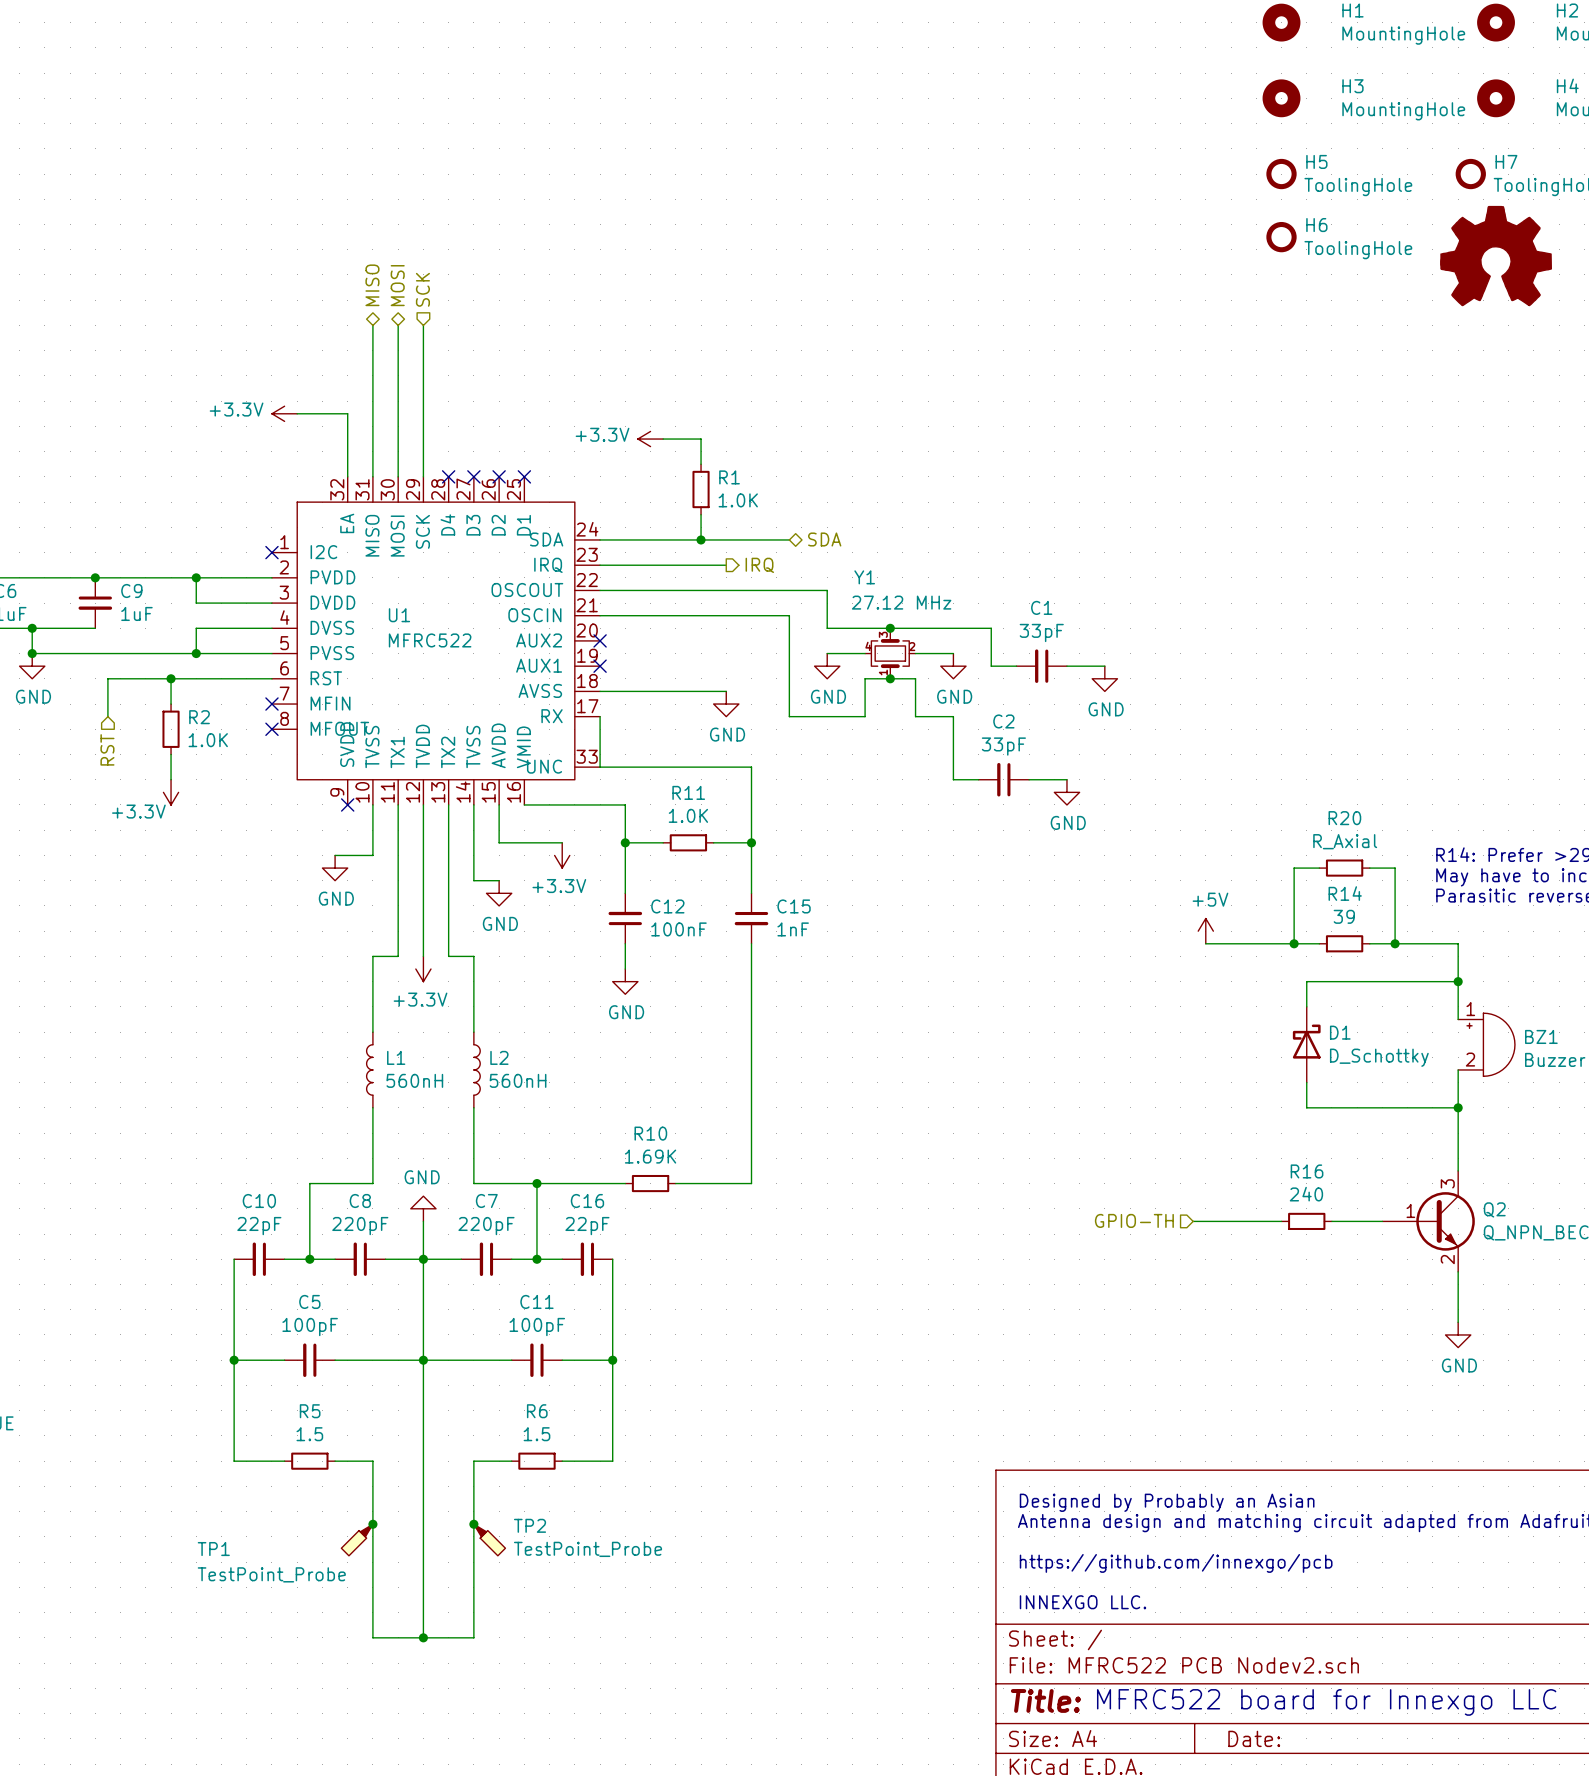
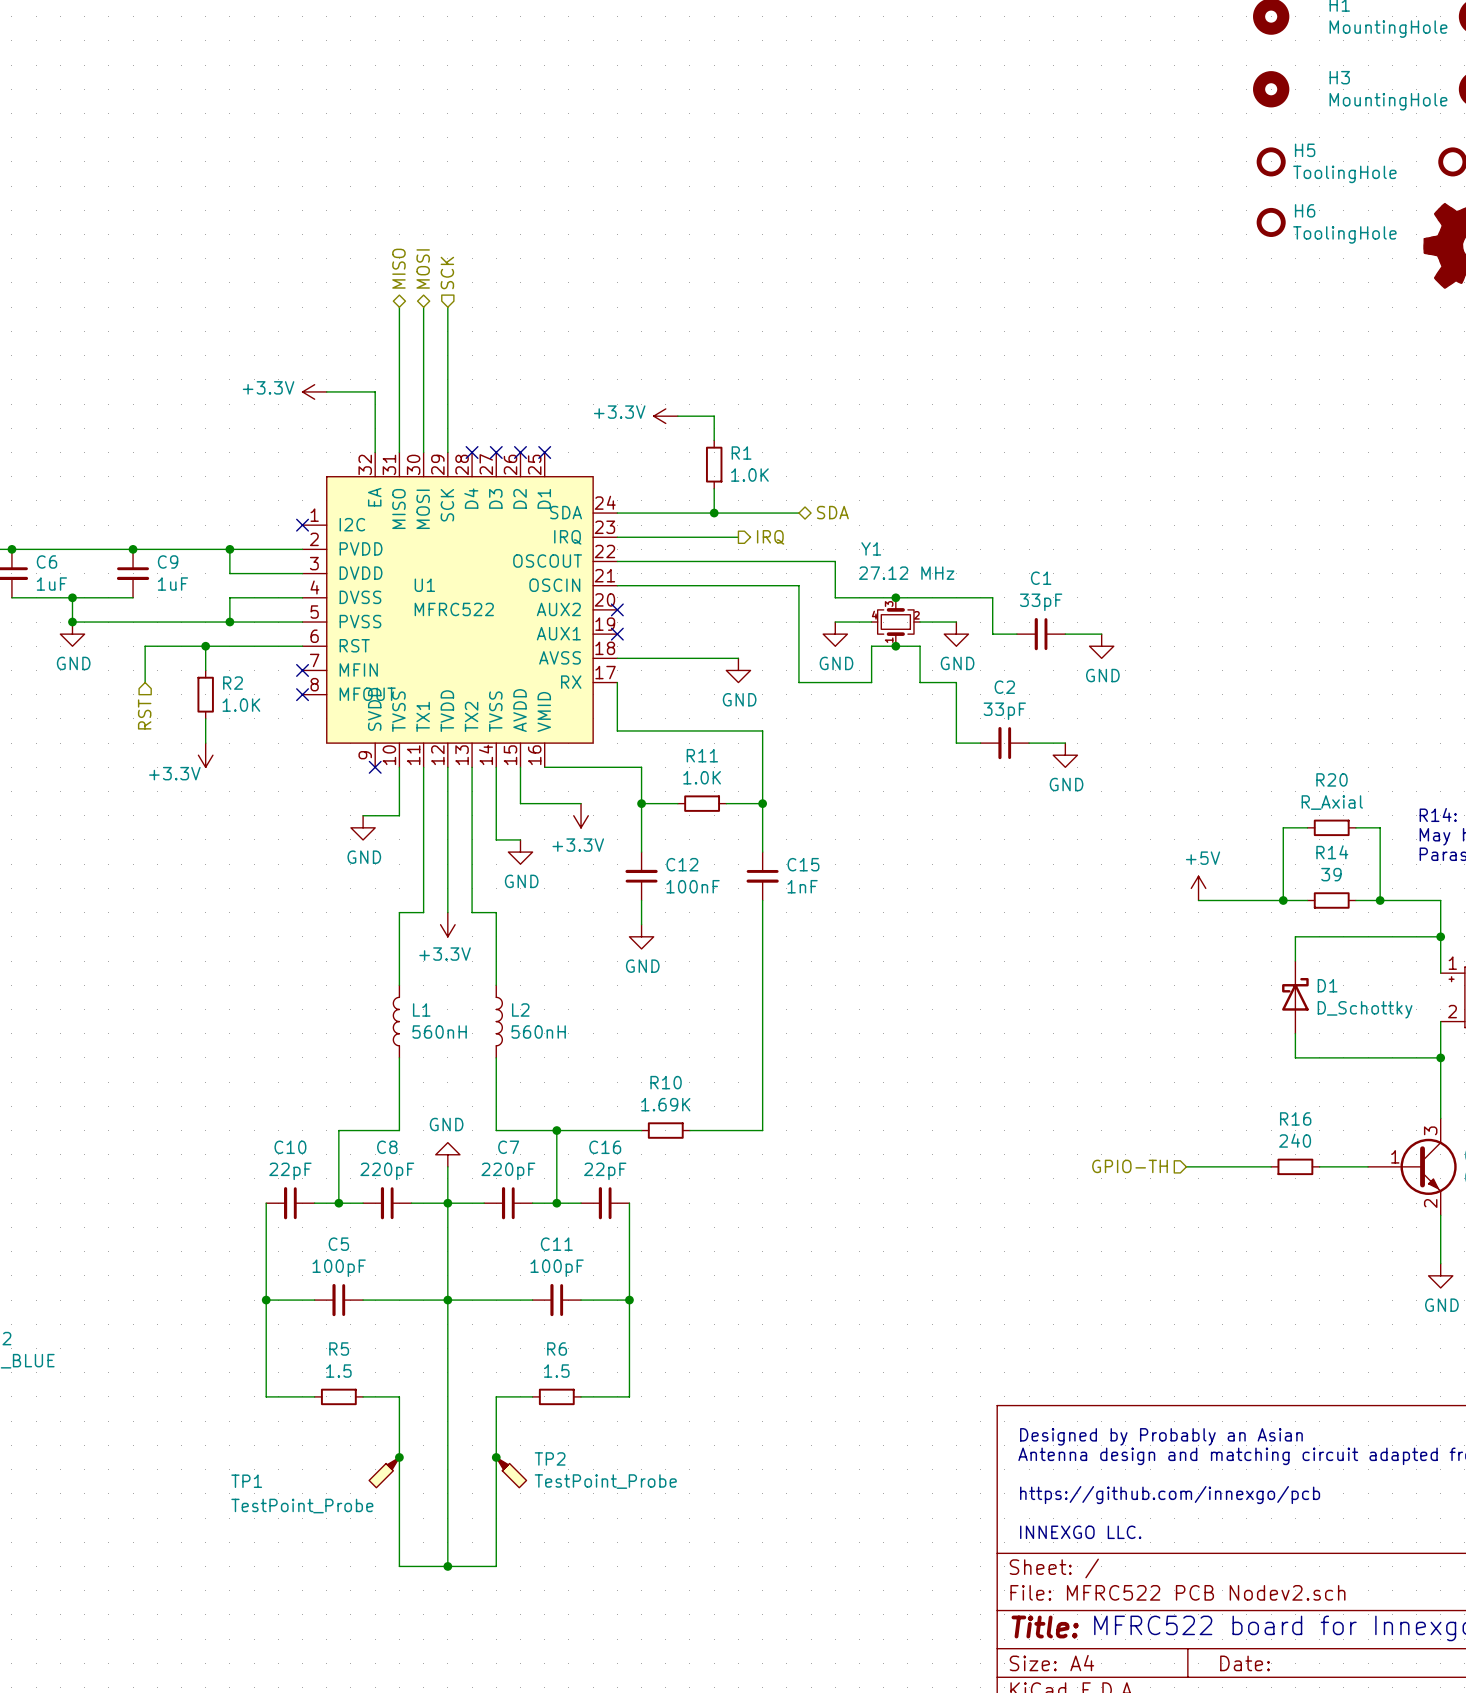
U1 symbol: [271, 476, 601, 805] -> [302, 452, 618, 768]

